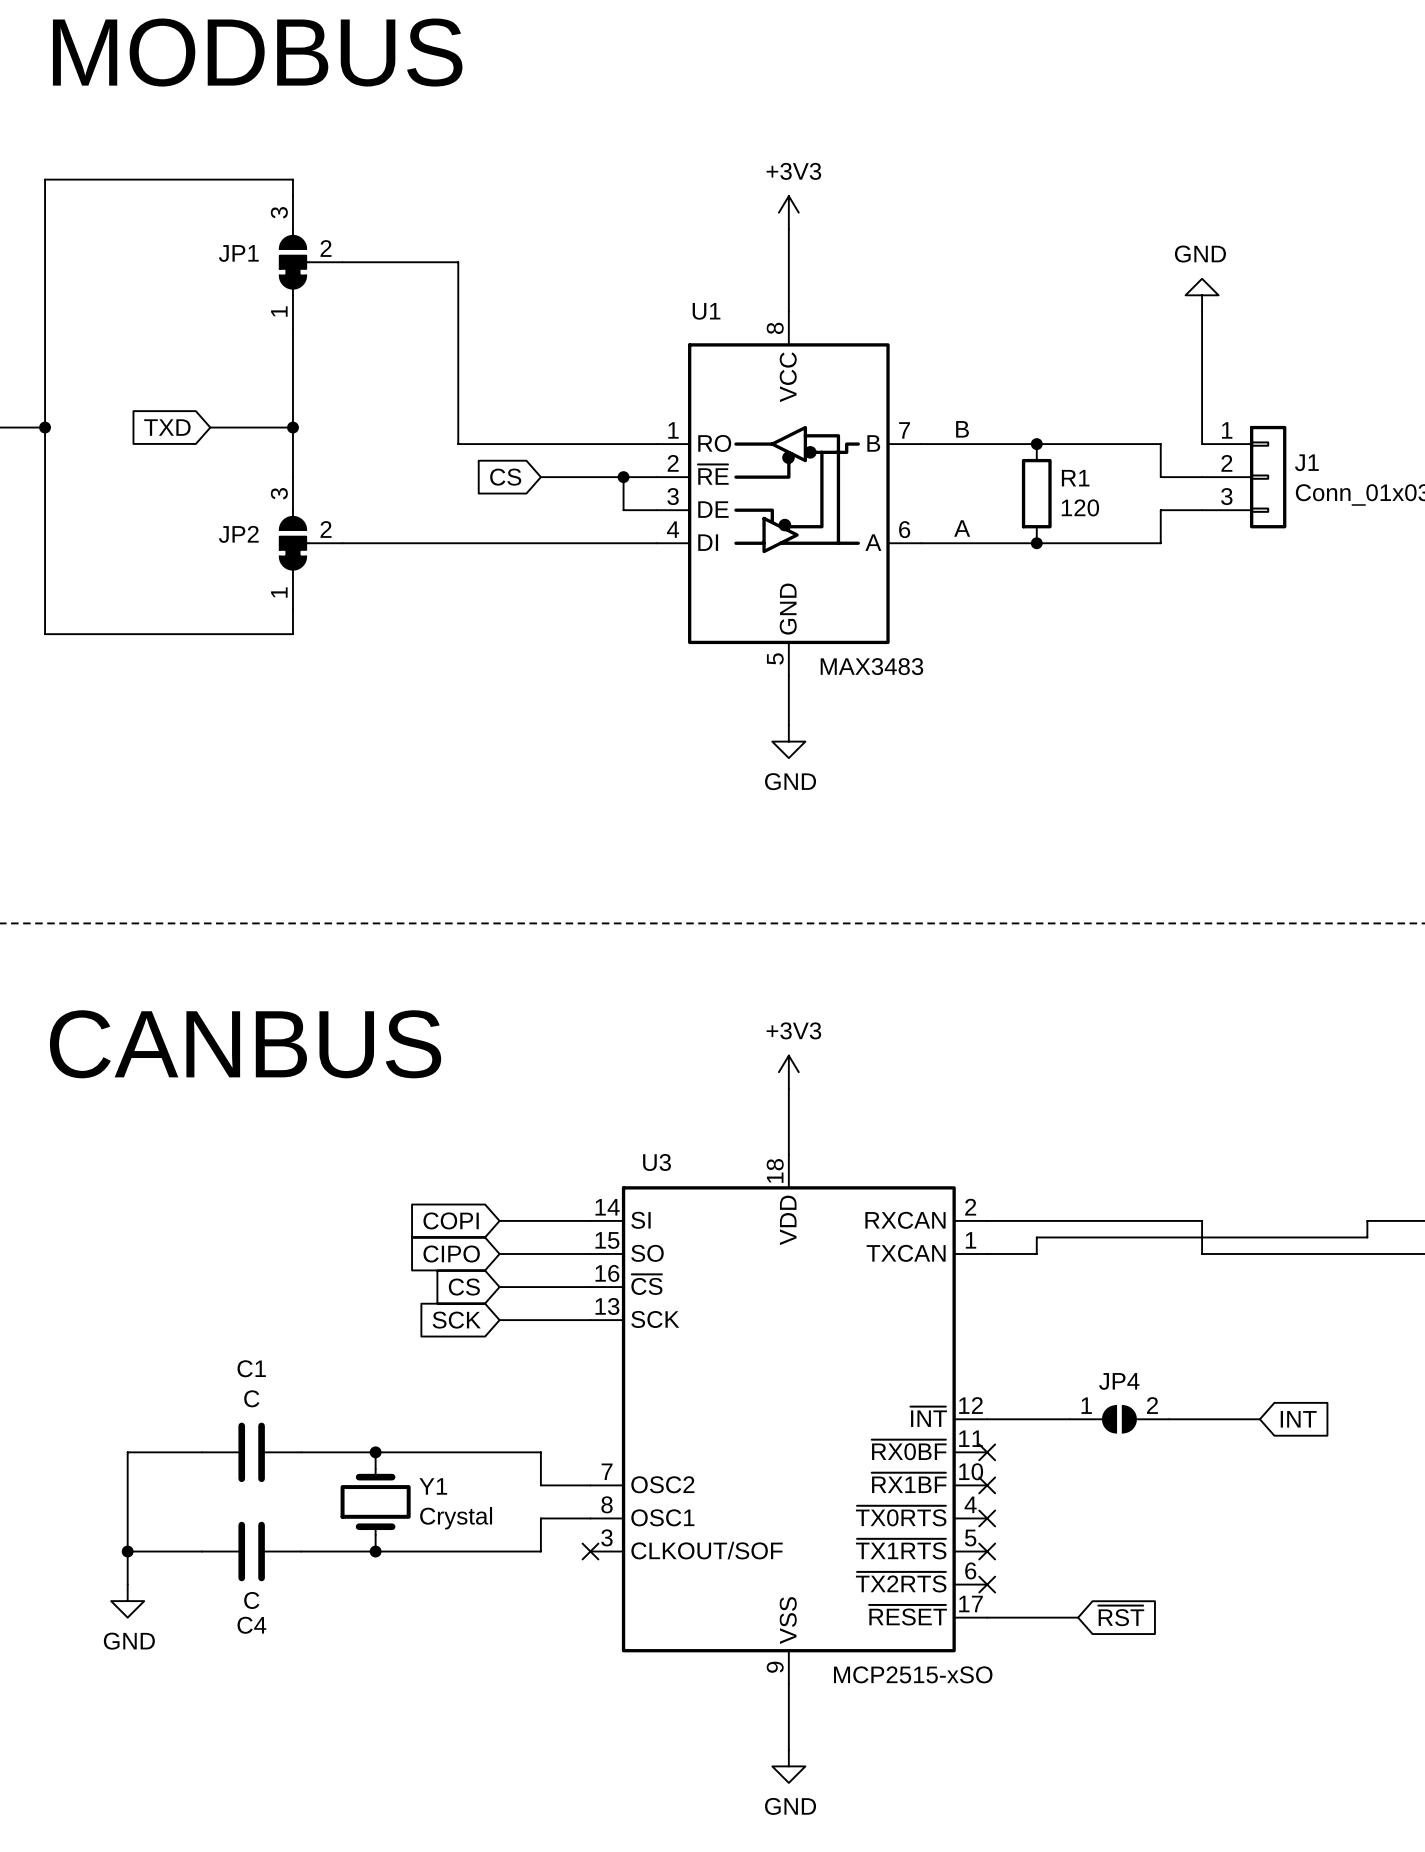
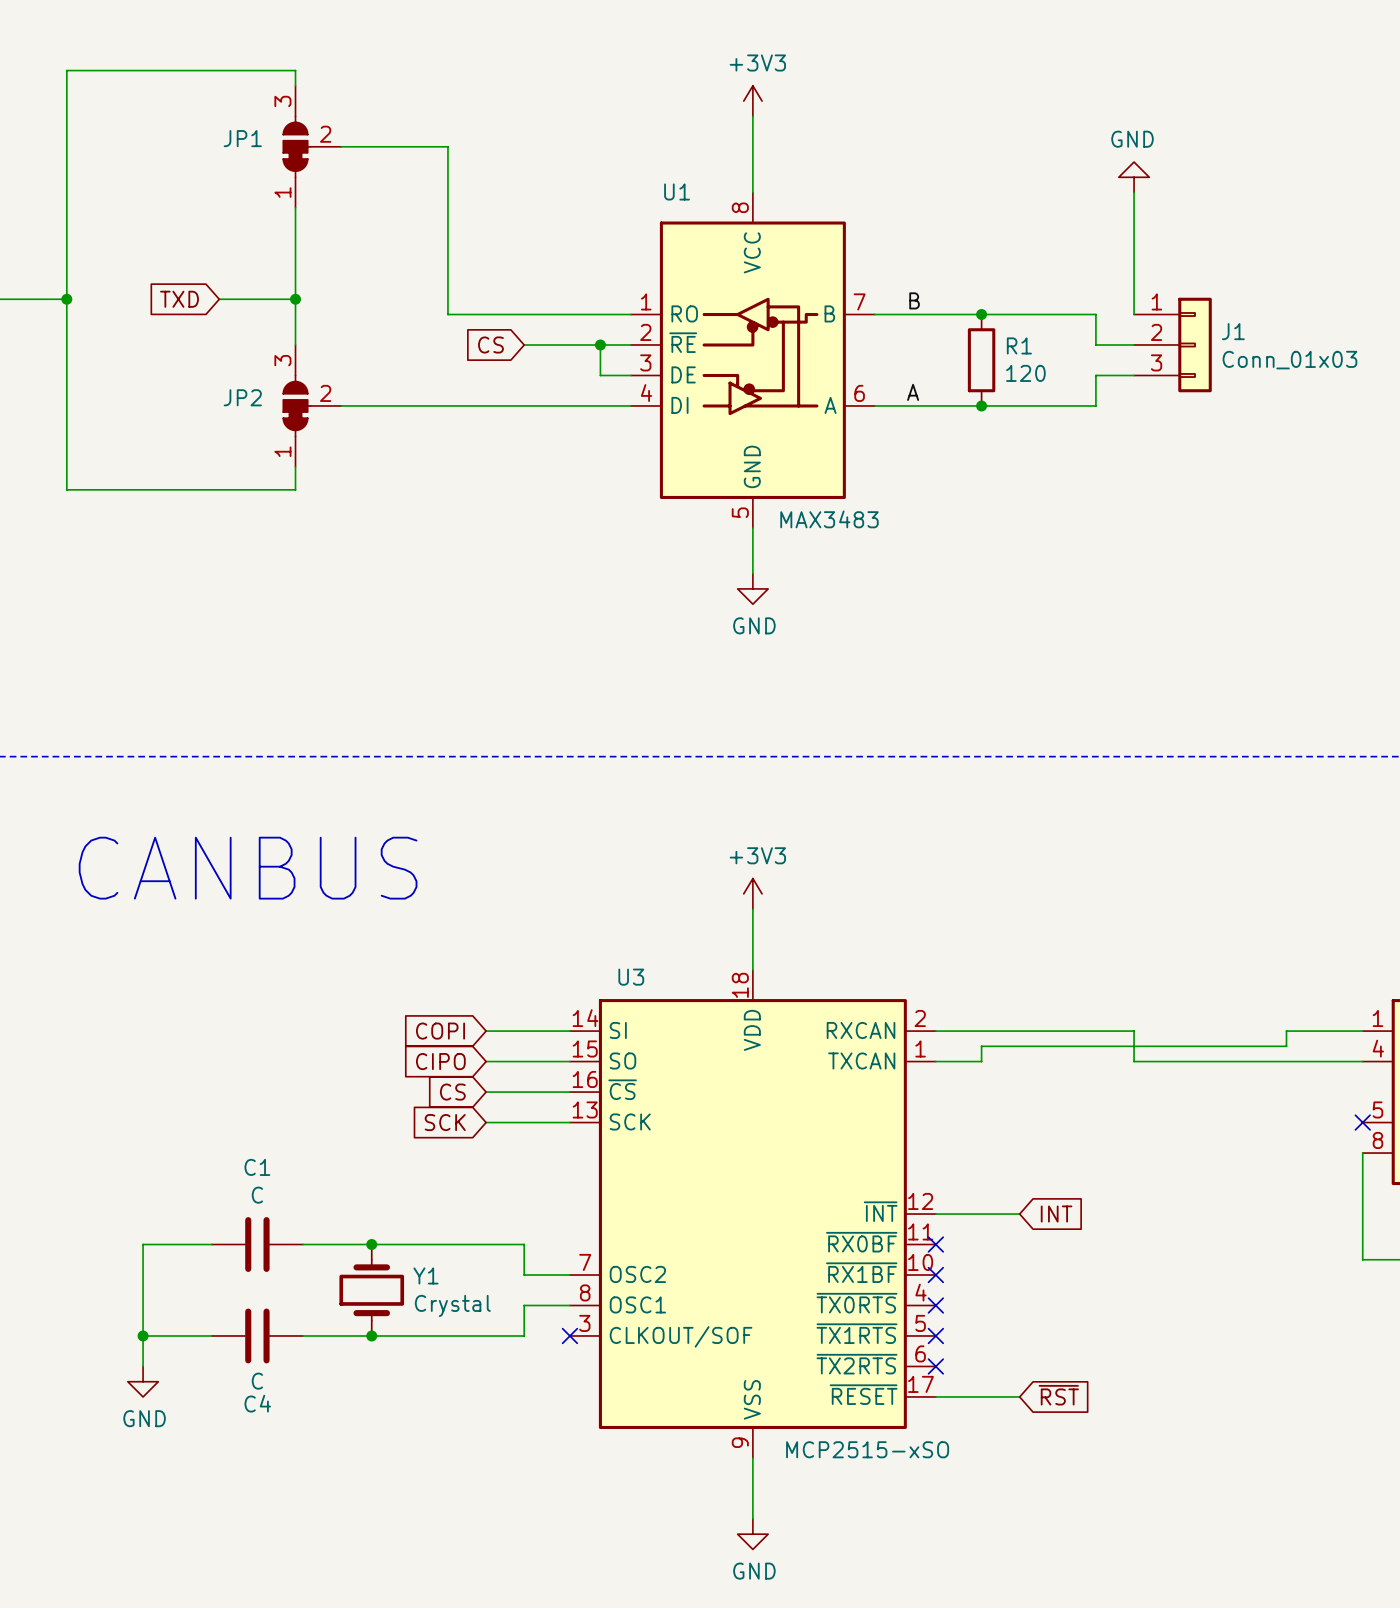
JP4: (1119, 1419) -> none
wire: (1169, 1419) (1259, 1419) -> none
global label position: INT (1298, 1419) -> INT (1056, 1214)

